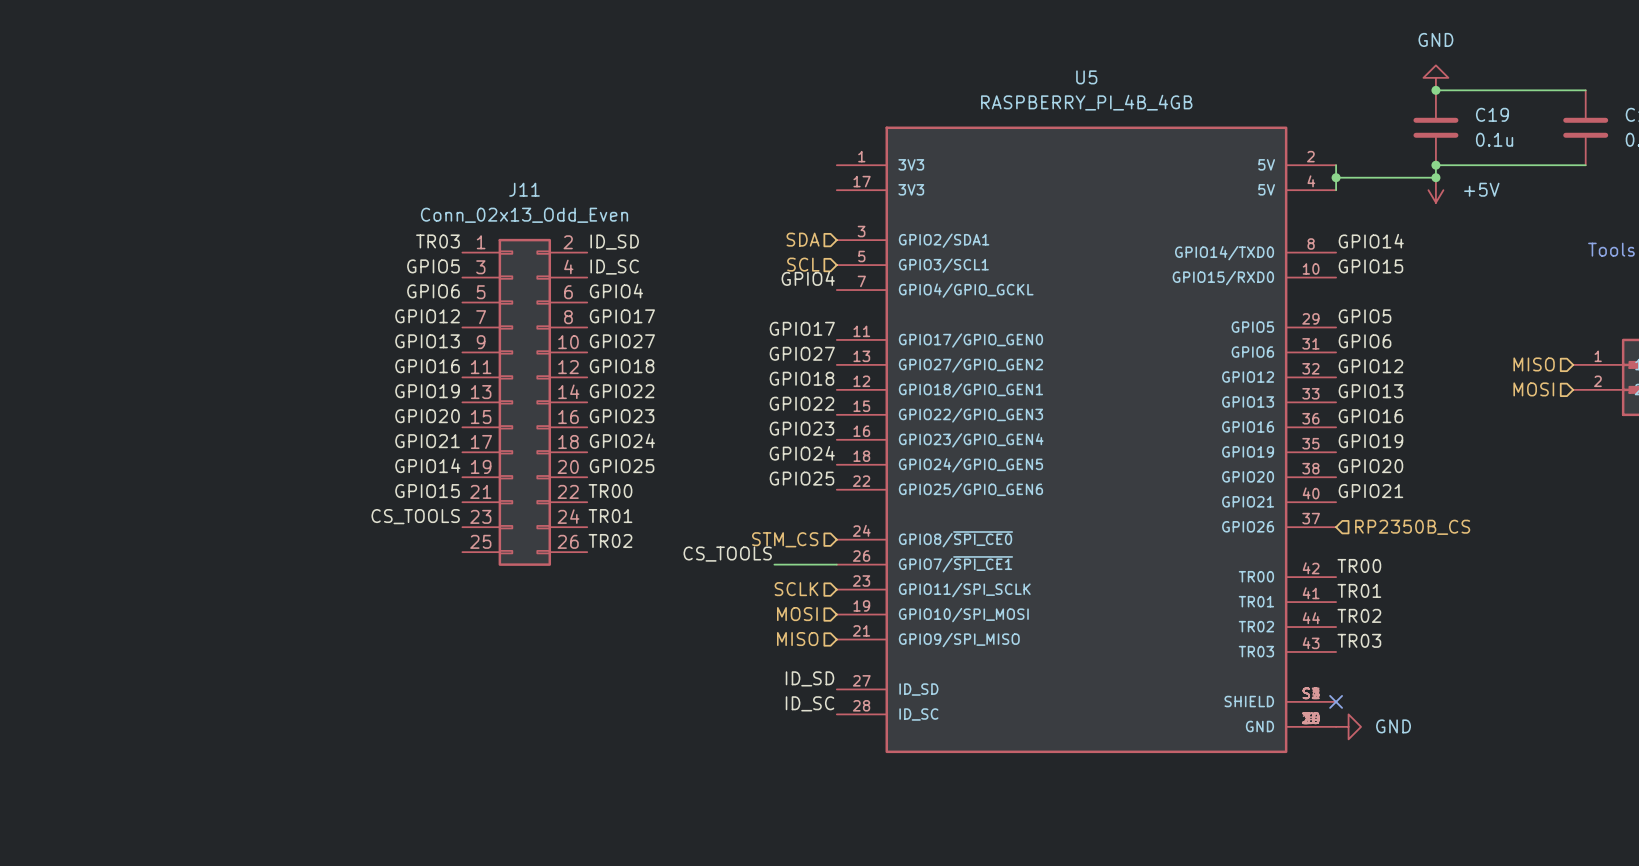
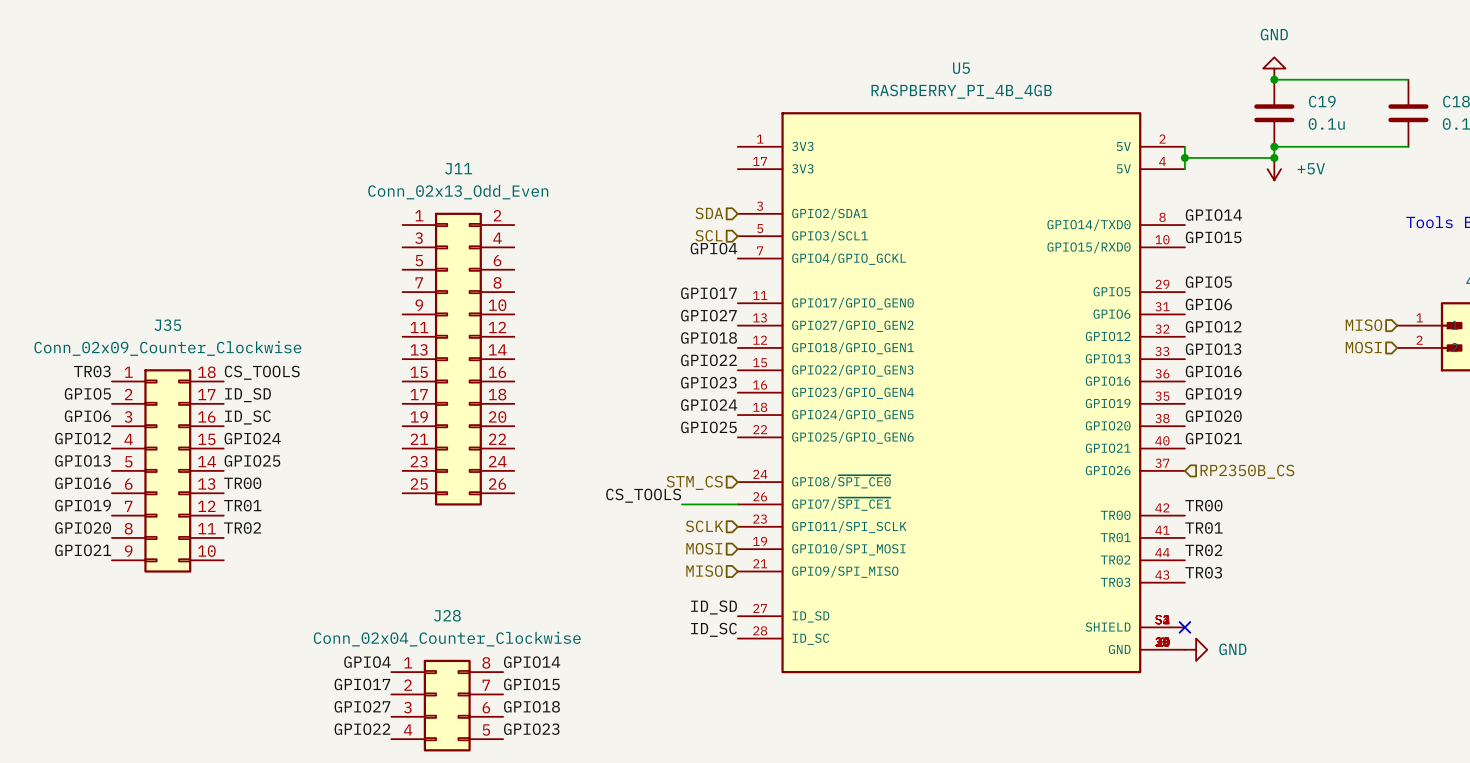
label: TR03 (437, 241) -> none
label: ID_SD (614, 242) -> none
label: GPIO5 (433, 266) -> none
label: ID_SC (614, 267) -> none
label: GPIO6 (433, 291) -> none
label: GPIO4 (616, 291) -> none
label: GPIO12 (427, 316) -> none
label: GPIO17 (622, 316) -> none
label: GPIO13 (427, 341) -> none
label: GPIO27 (622, 341) -> none
label: GPIO16 (427, 366) -> none
label: GPIO18 (622, 366) -> none
label: GPIO19 (427, 391) -> none
label: GPIO22 (622, 391) -> none
label: none -> TR03 (92, 371)
label: GPIO20 (427, 416) -> none
label: GPIO23 (622, 416) -> none
label: GPIO24 (622, 440) -> none
label: none -> GPIO5 (87, 393)
label: none -> ID_SD (247, 395)
label: GPIO21 (427, 441) -> none
label: GPIO14 (427, 465) -> none
label: none -> GPIO6 (87, 416)
label: none -> ID_SC (247, 417)
label: GPIO25 (622, 466) -> none
label: none -> GPIO24 (252, 438)
label: none -> GPIO12 (83, 438)
label: GPIO15 (427, 491) -> none
label: TR00 (610, 491) -> none
label: none -> GPIO13 (82, 460)
label: none -> GPIO25 (252, 460)
label position: CS_TOOLS (415, 516) -> CS_TOOLS (262, 372)
label: TR01 (610, 516) -> none
J35: none -> Conn_02x09_Counter_Clockwise (167, 470)
label: none -> GPIO16 (83, 483)
label: none -> TR00 (242, 483)
label: TR02 (610, 541) -> none
label: none -> GPIO19 (83, 505)
label: none -> TR01 (242, 505)
label: none -> GPIO20 (83, 528)
label: none -> TR02 (242, 528)
label: none -> GPIO21 (83, 550)
label: none -> GPIO4 (367, 662)
label: none -> GPIO14 (532, 662)
label: none -> GPIO17 (362, 684)
label: none -> GPIO15 (531, 684)
J28: none -> Conn_02x04_Counter_Clockwise (447, 705)
label: none -> GPIO27 (362, 706)
label: none -> GPIO18 (531, 706)
label: none -> GPIO22 (362, 729)
label: none -> GPIO23 (531, 729)

